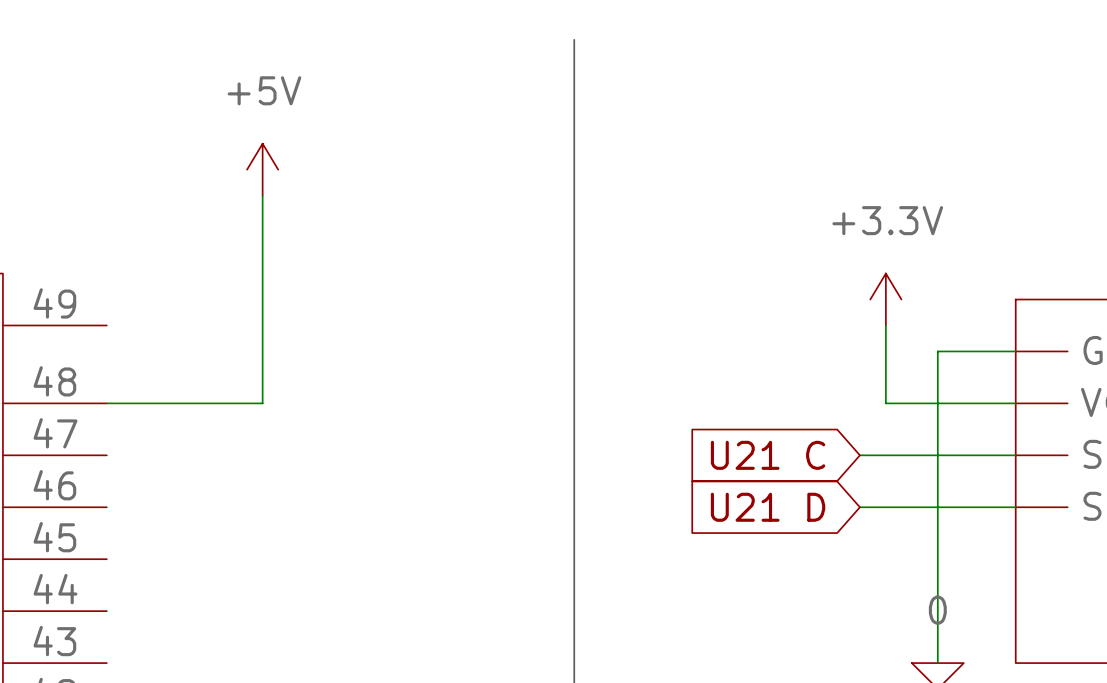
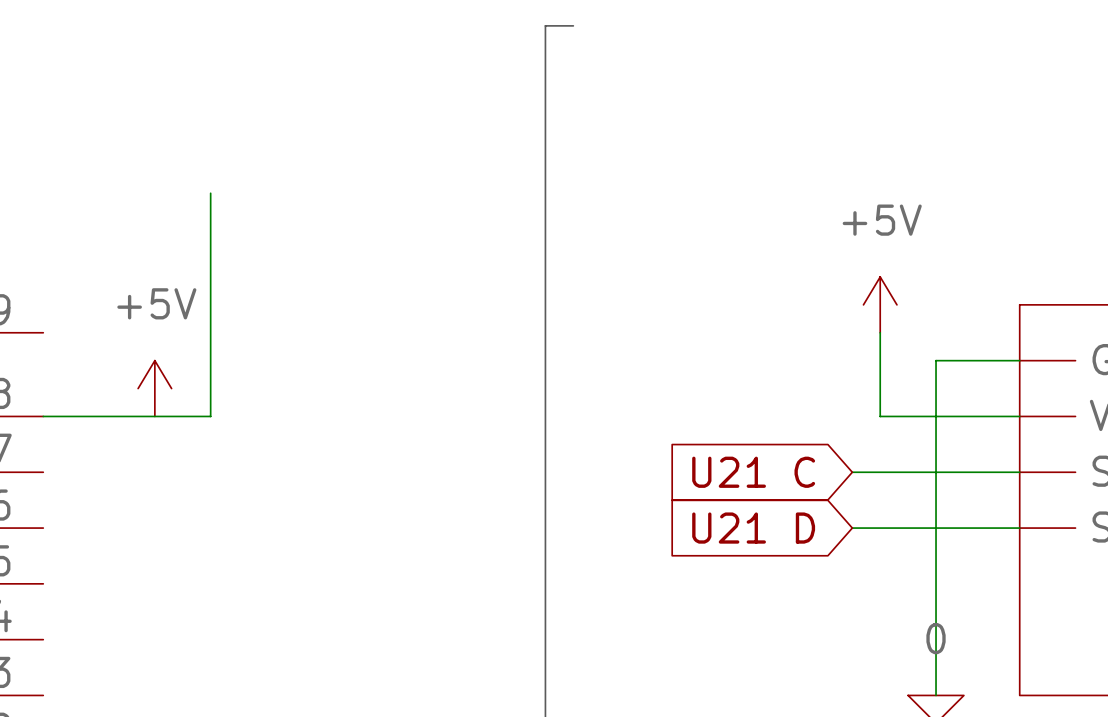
line: none -> (545, 25) (573, 25)
power symbol position: +5V (262, 169) -> +5V (154, 388)
power symbol: +3.3V (885, 299) -> +5V (880, 304)

